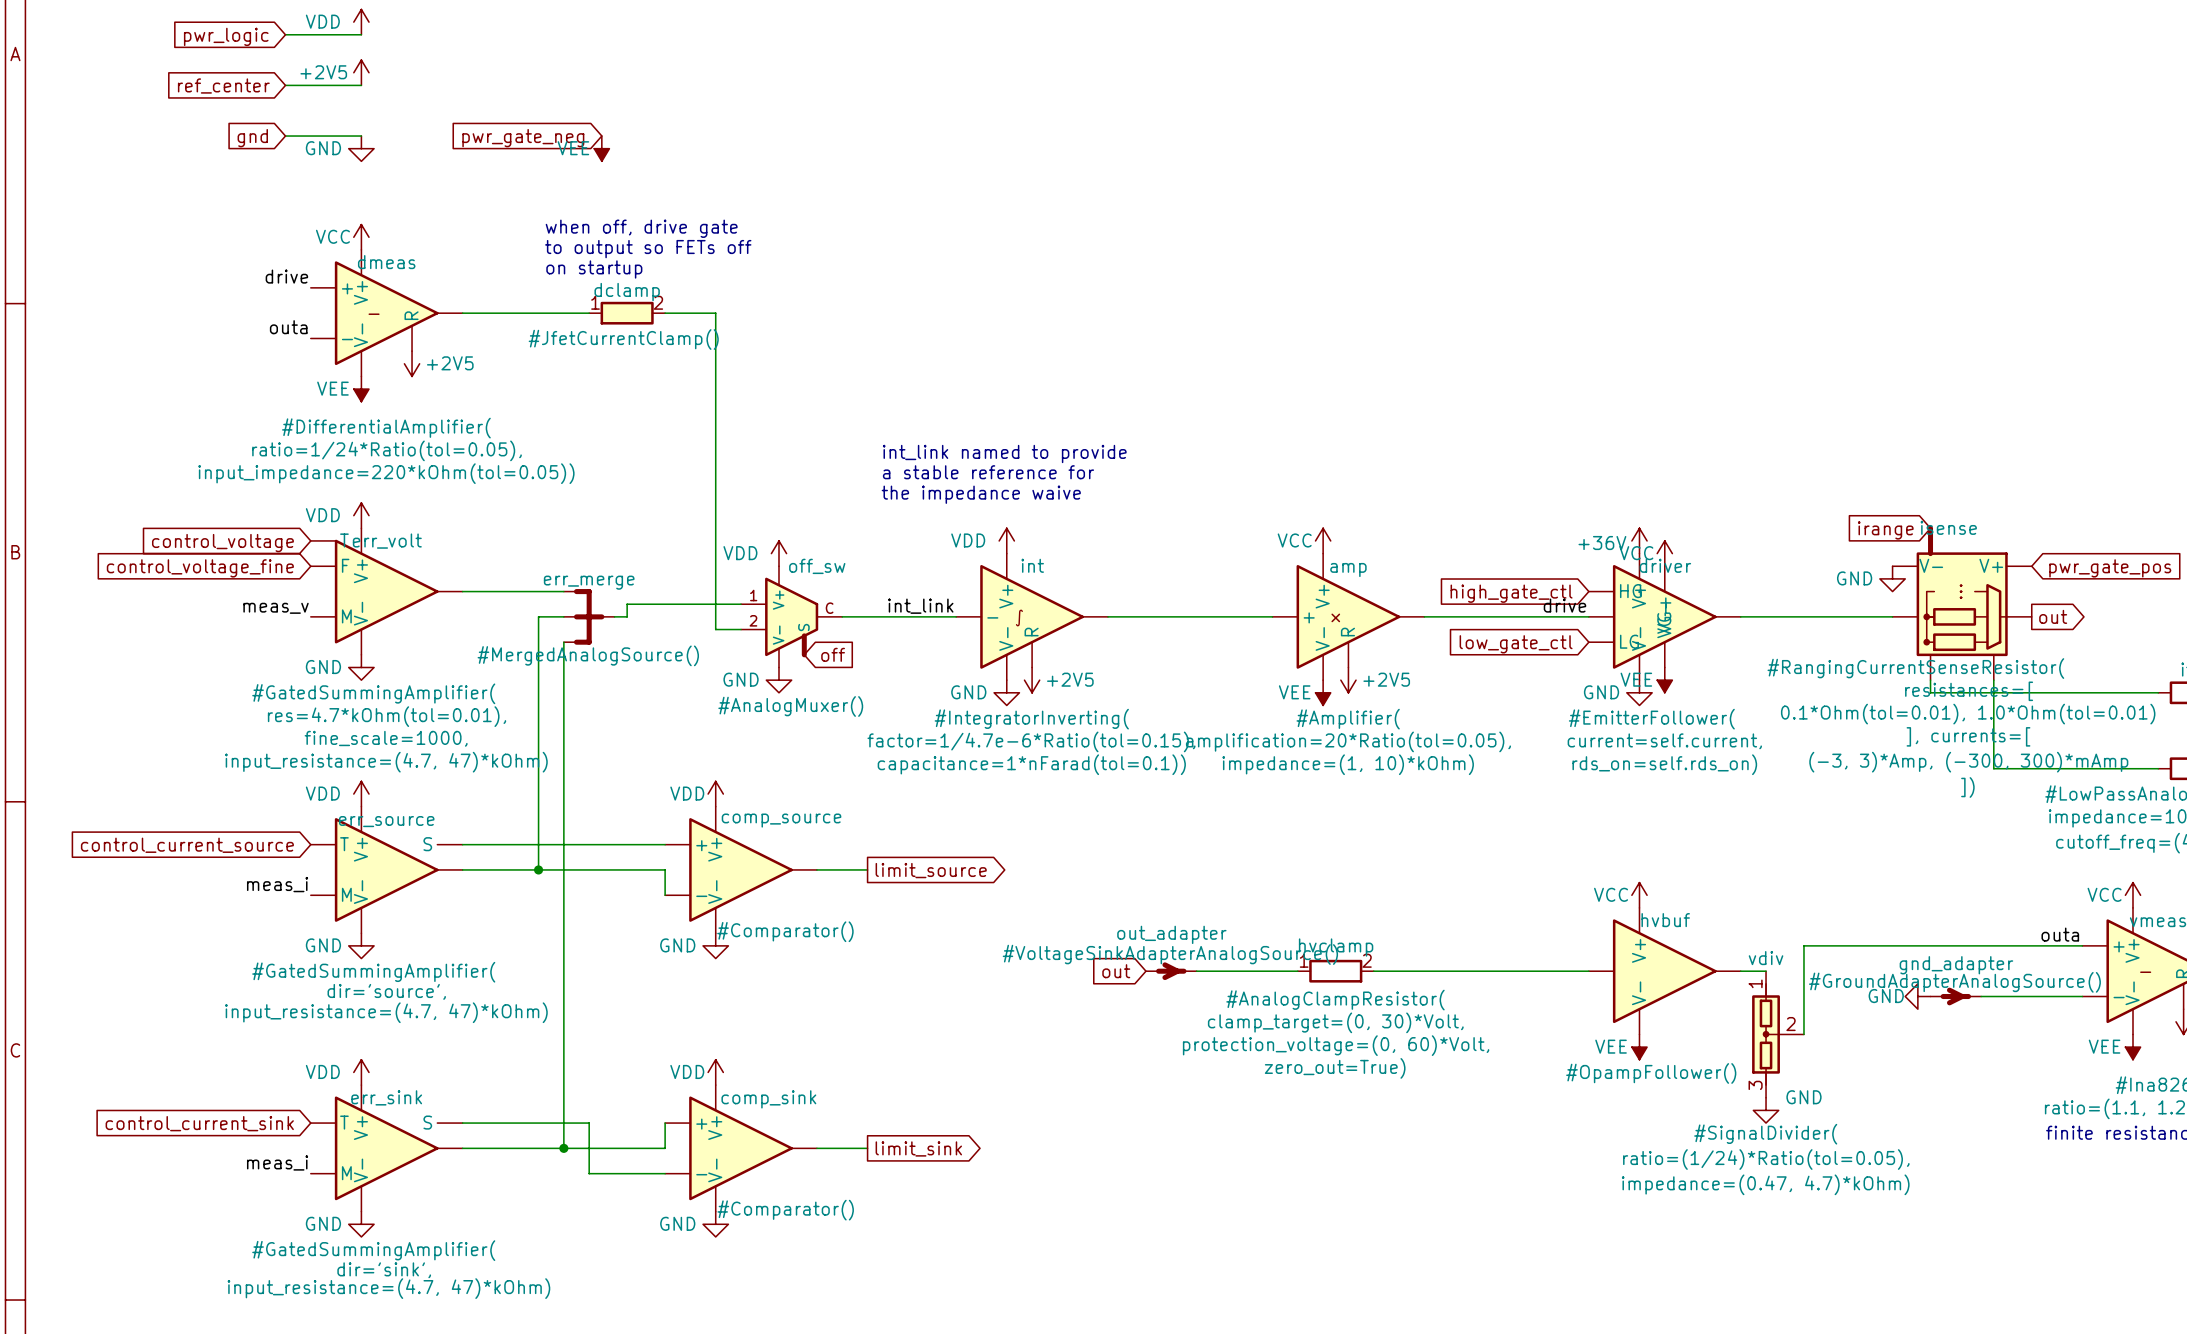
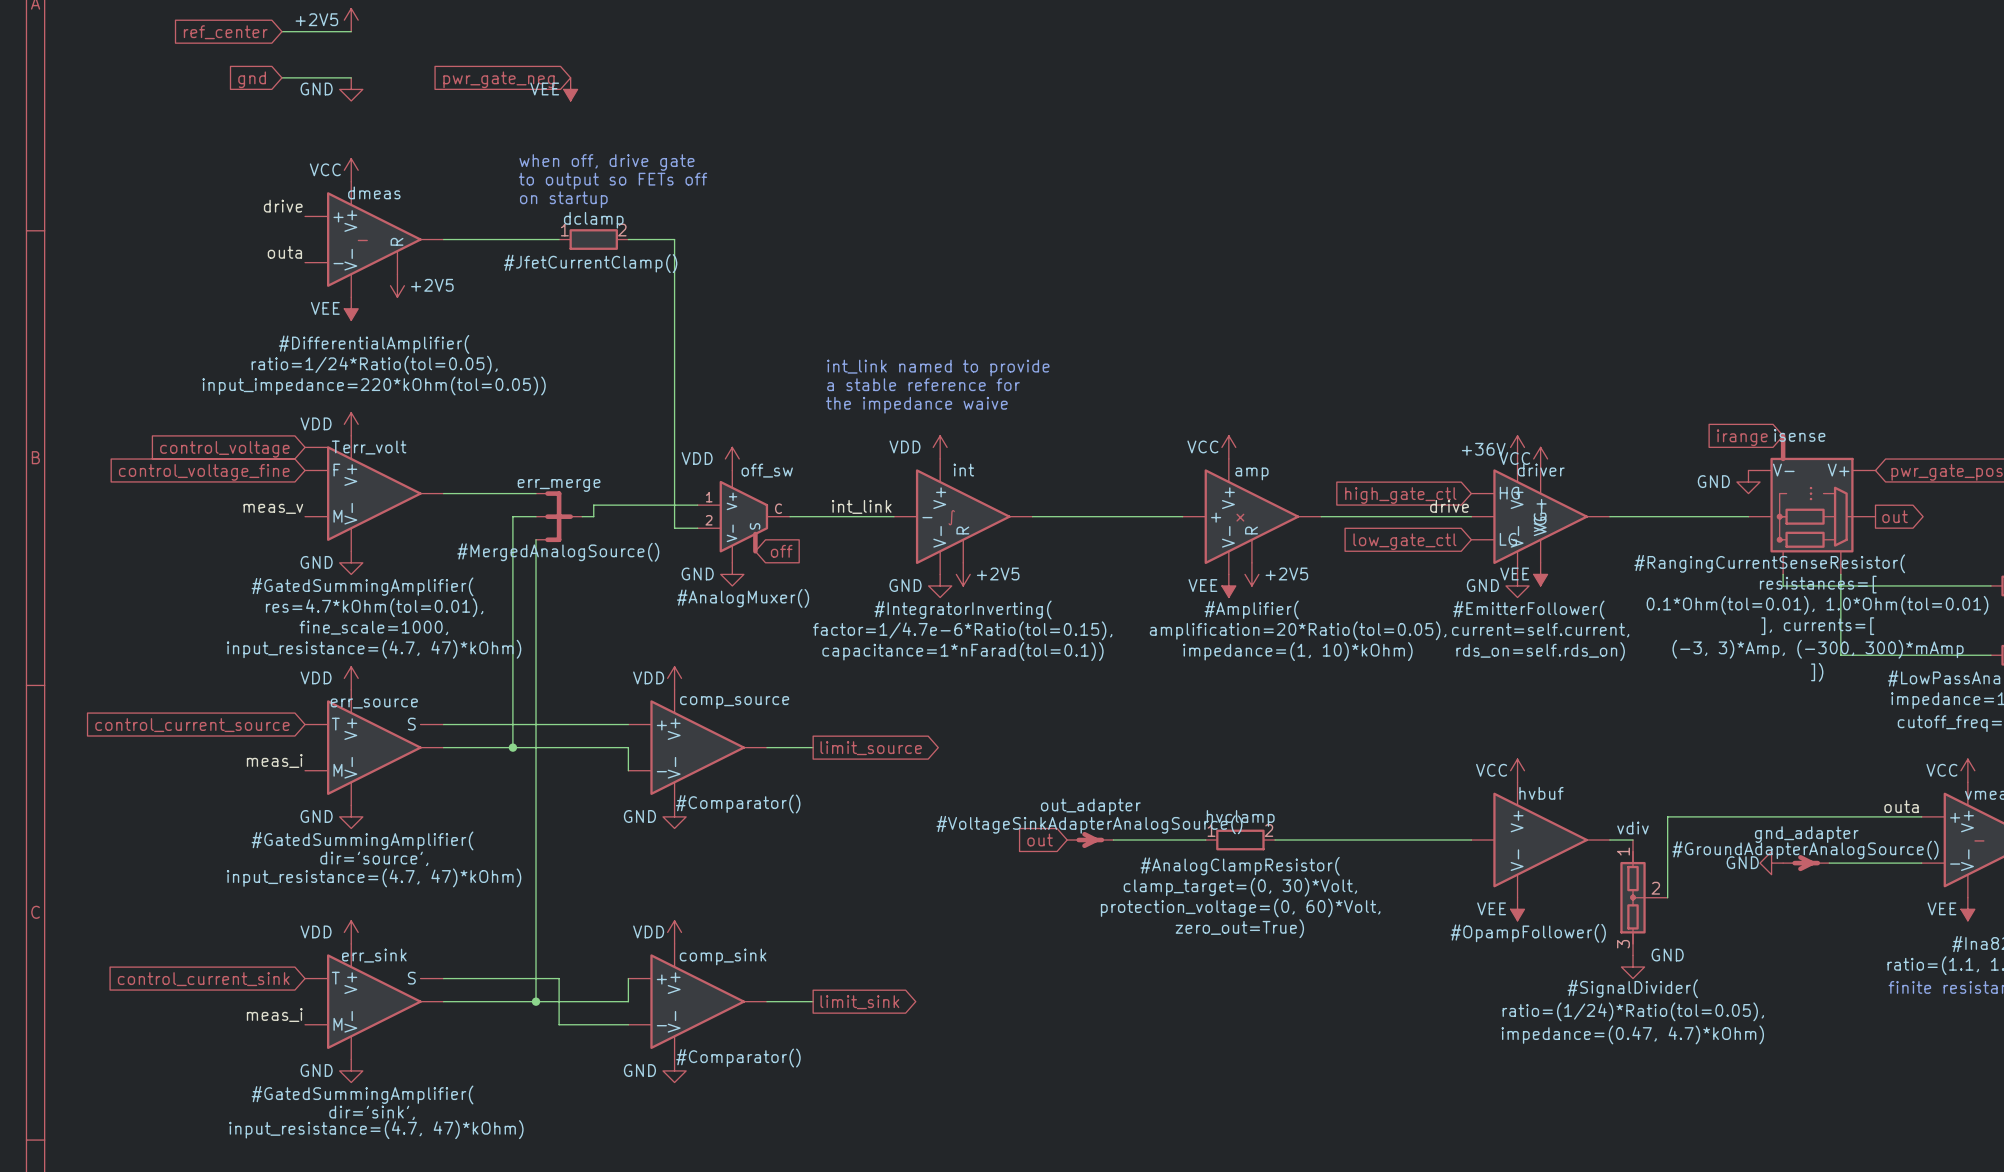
amp text position: amplification=20*Ratio(tol=0.05), (1348, 741) -> amplification=20*Ratio(tol=0.05), (1298, 630)
amp text position: impedance=(1, 10)*kOhm) (1348, 764) -> impedance=(1, 10)*kOhm) (1297, 651)

